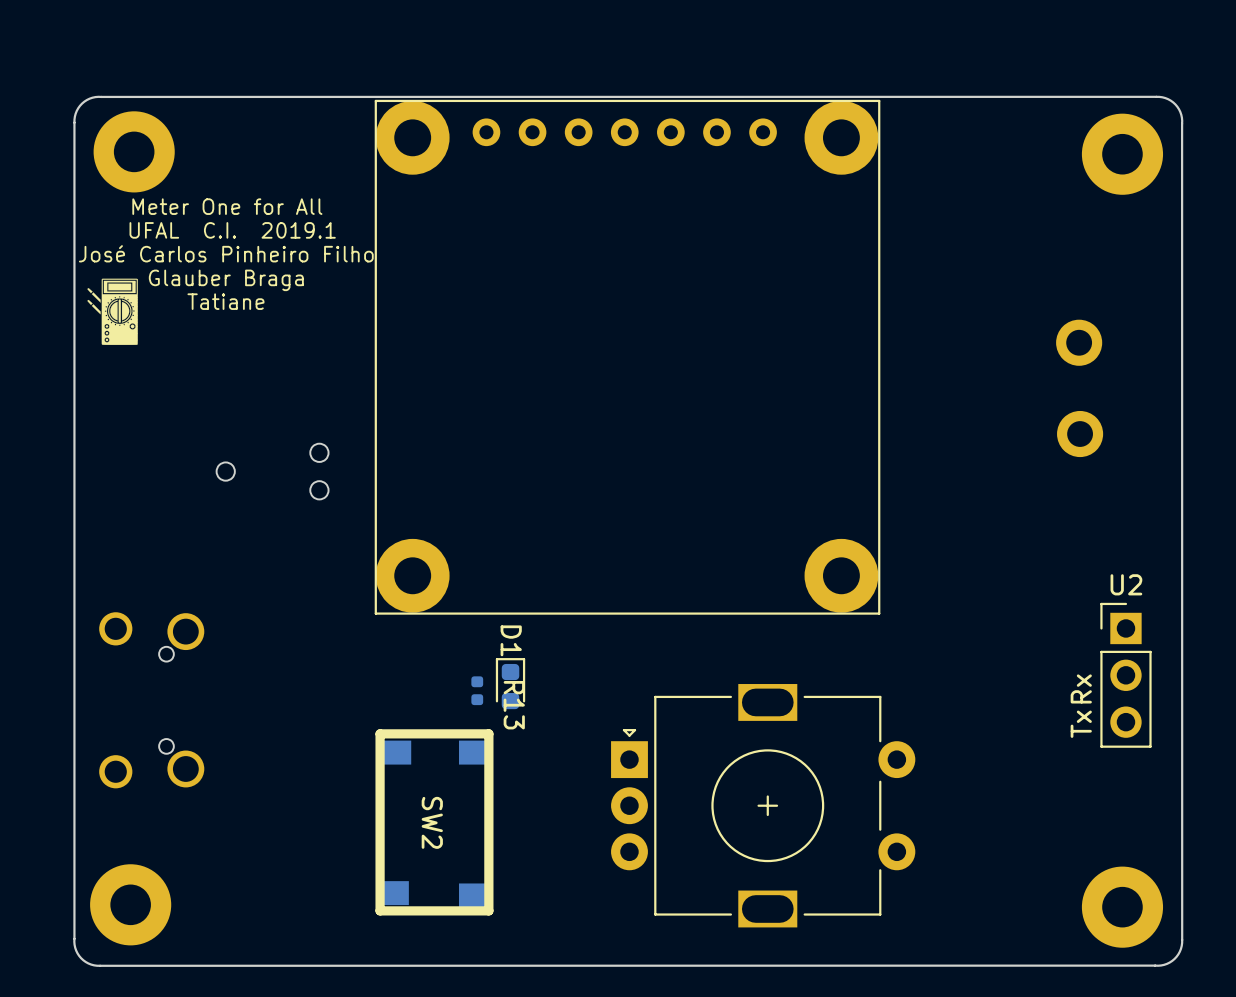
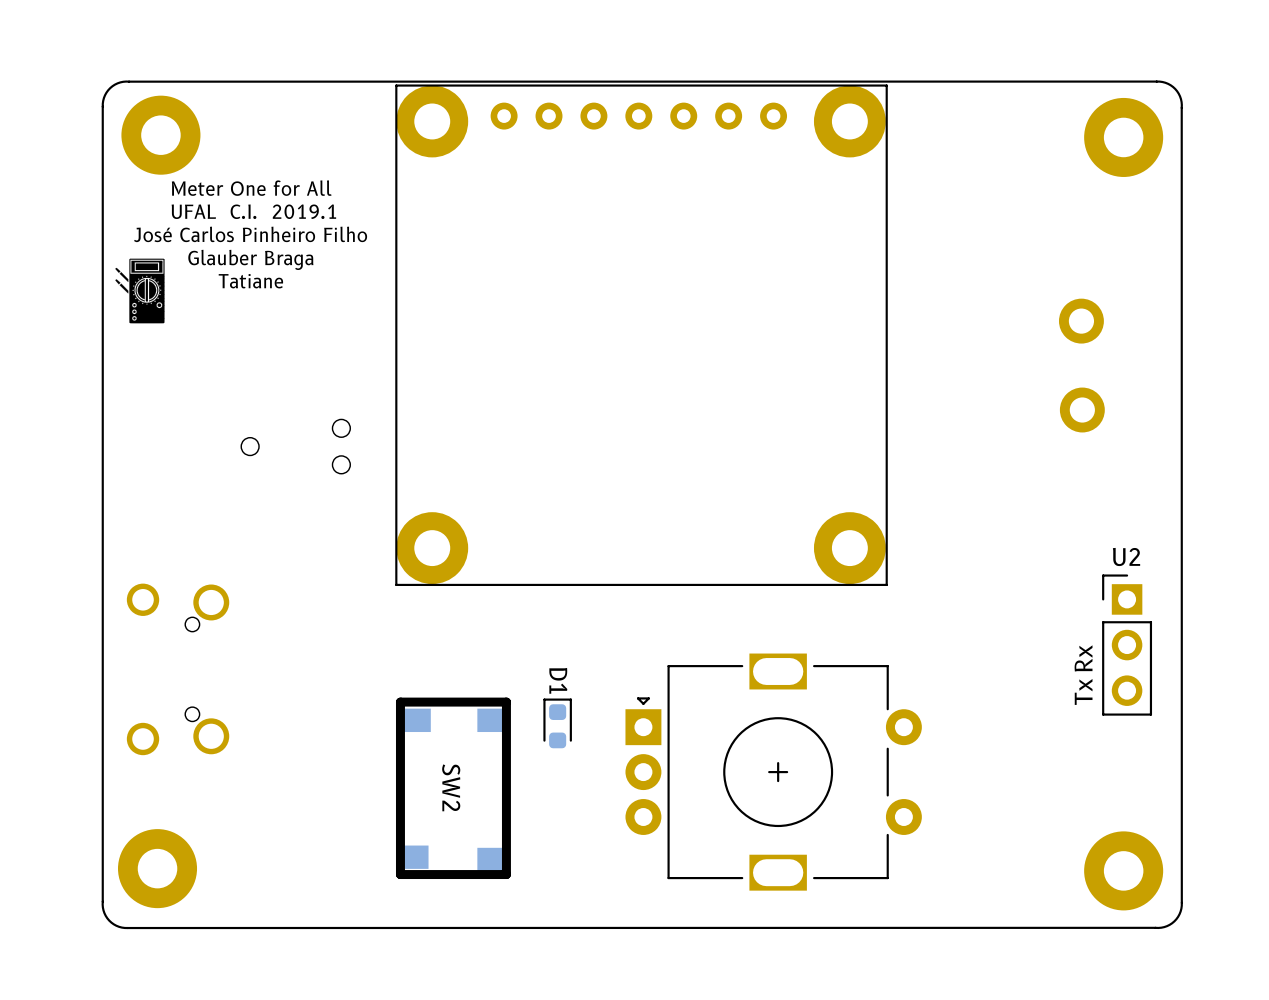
D1 position: (510, 683) -> (557, 723)
R13: (477, 690) -> none

